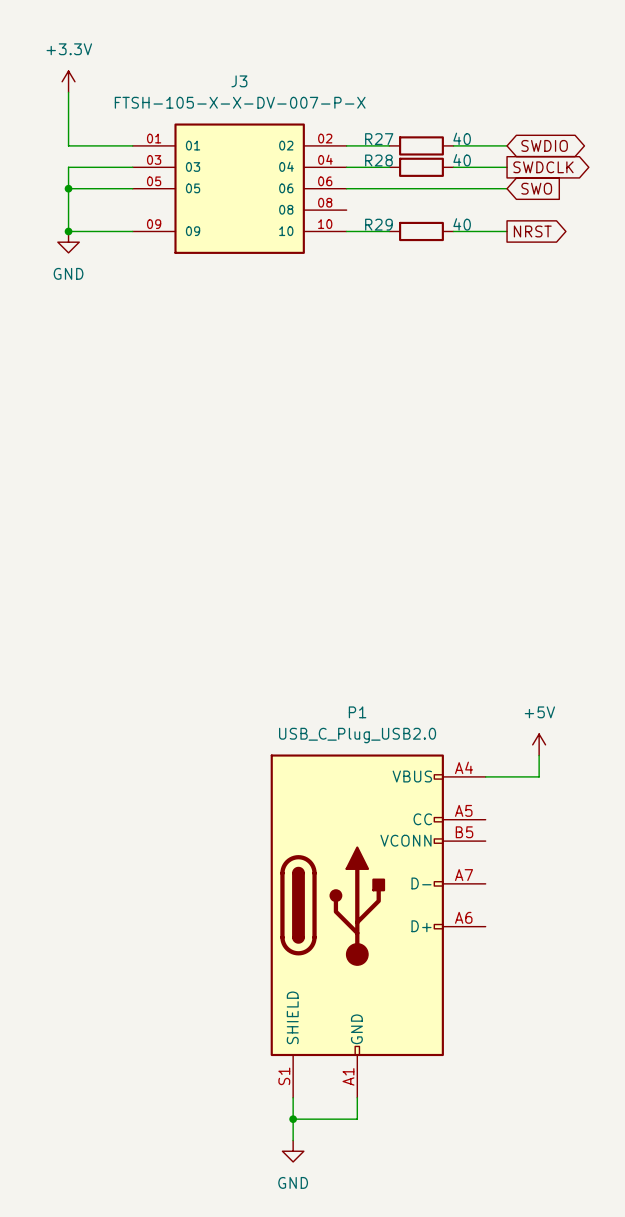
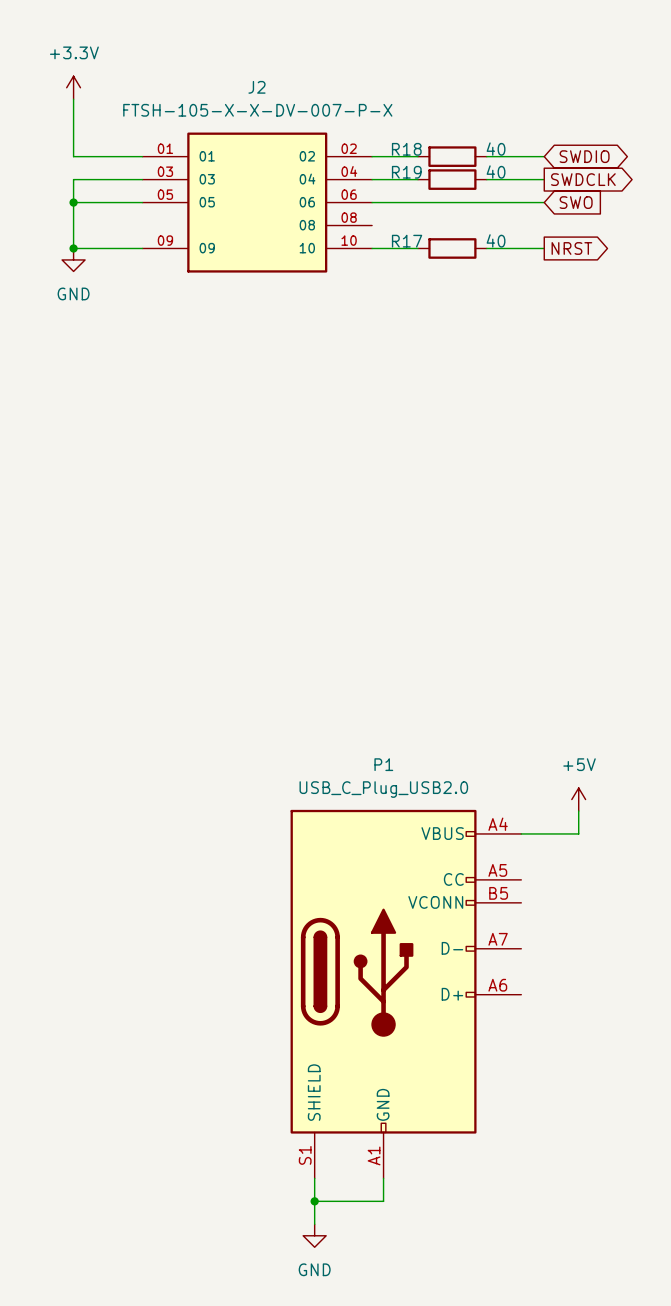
J3 name: J3 (239, 81) -> J2 (256, 87)
R27 name: R27 (379, 139) -> R18 (406, 149)
R28 name: R28 (378, 160) -> R19 (406, 172)
R29 name: R29 (378, 224) -> R17 (407, 241)

